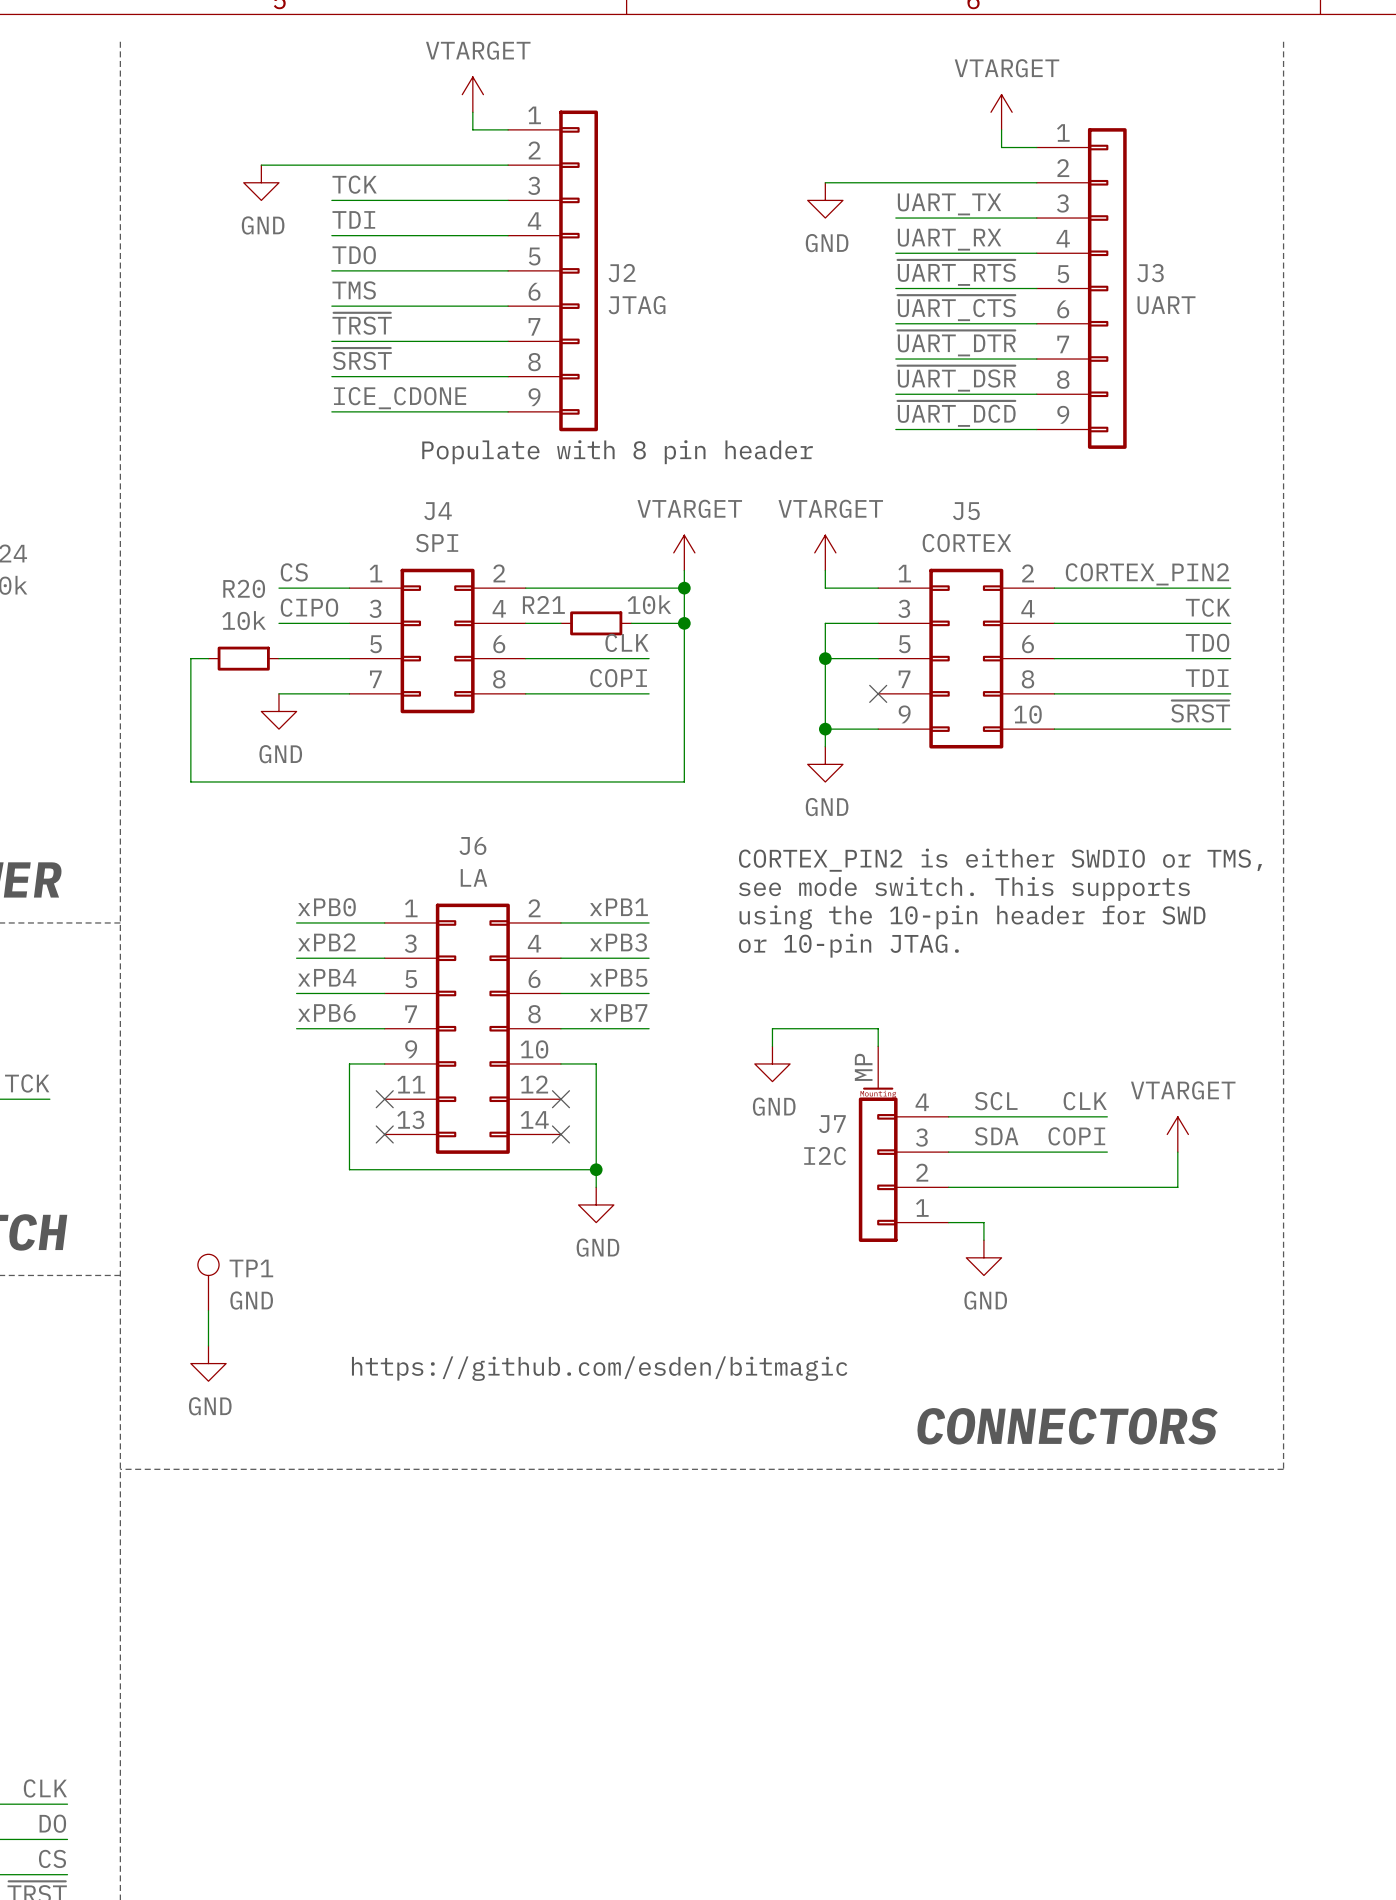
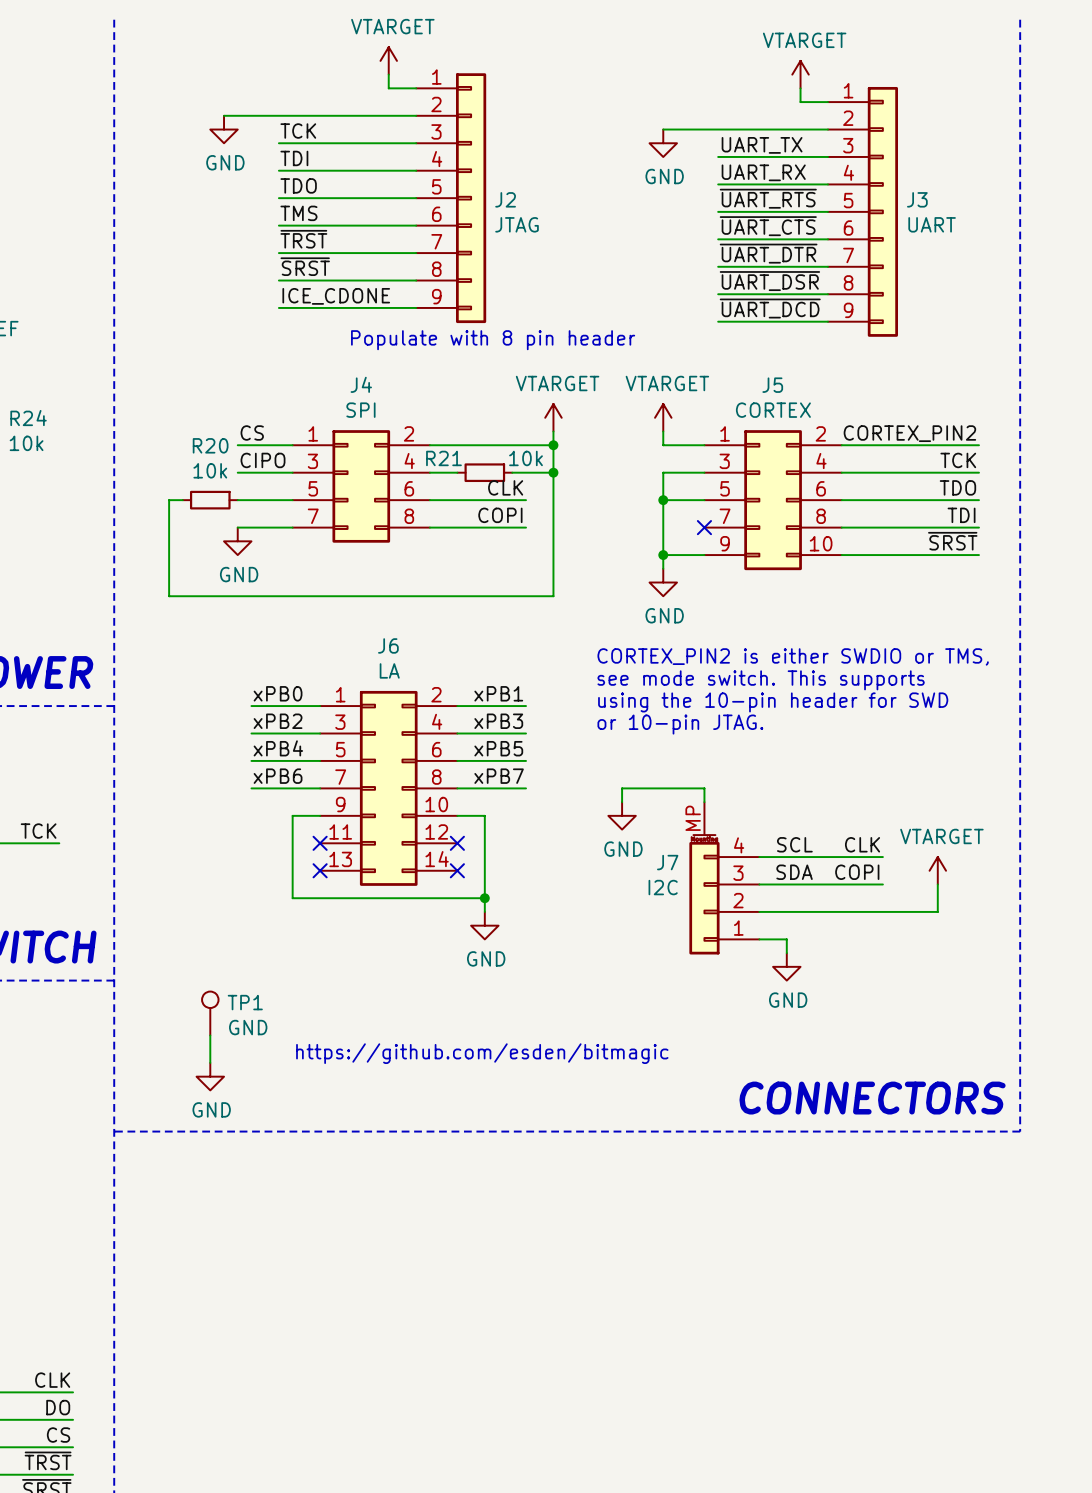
TP1 position: (208, 1282) -> (210, 1013)
wire: (208, 1310) (208, 1345) -> (210, 1035) (210, 1062)
power symbol position: GND (208, 1363) -> GND (210, 1076)

